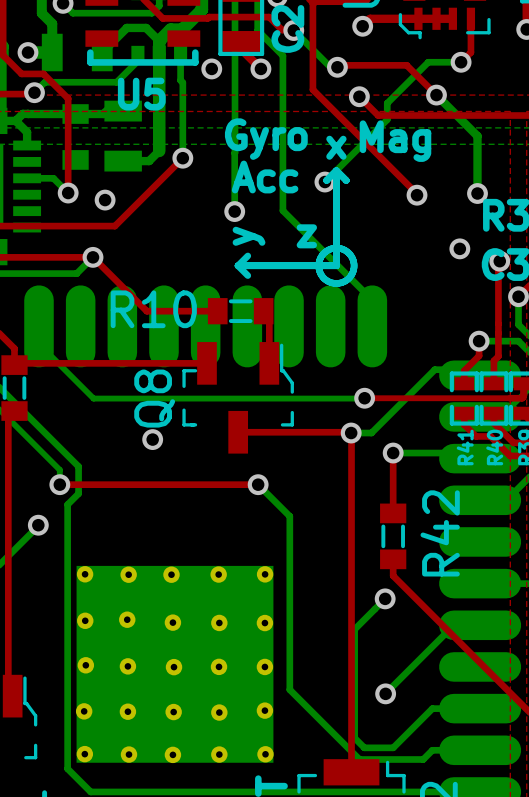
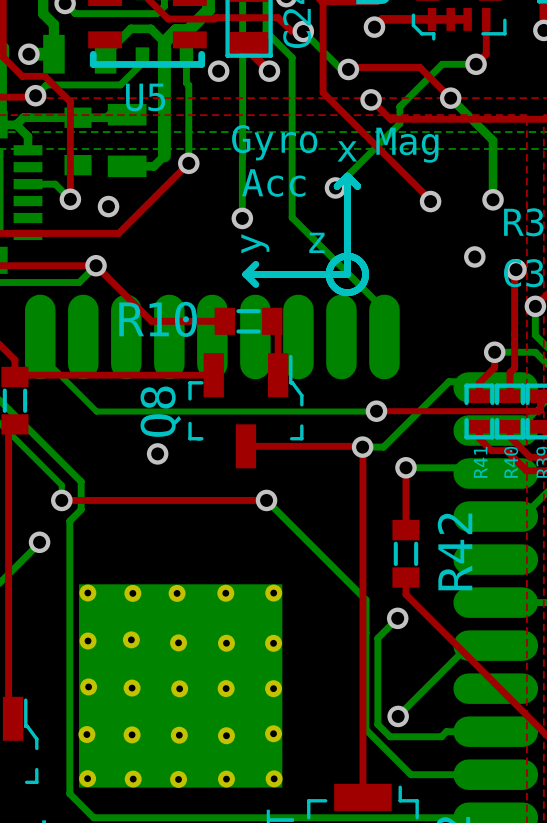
bottom track: (289, 516) (289, 689) (359, 759) (423, 759) (432, 750) -> (365, 633) (365, 729) (411, 774) (446, 774)
bottom track: none -> (299, 533) (365, 599) (365, 633)
bottom track: (365, 618) (354, 629) (354, 738) (364, 747) (393, 747) (427, 713) -> (377, 638) (377, 724) (390, 736) (441, 736)

